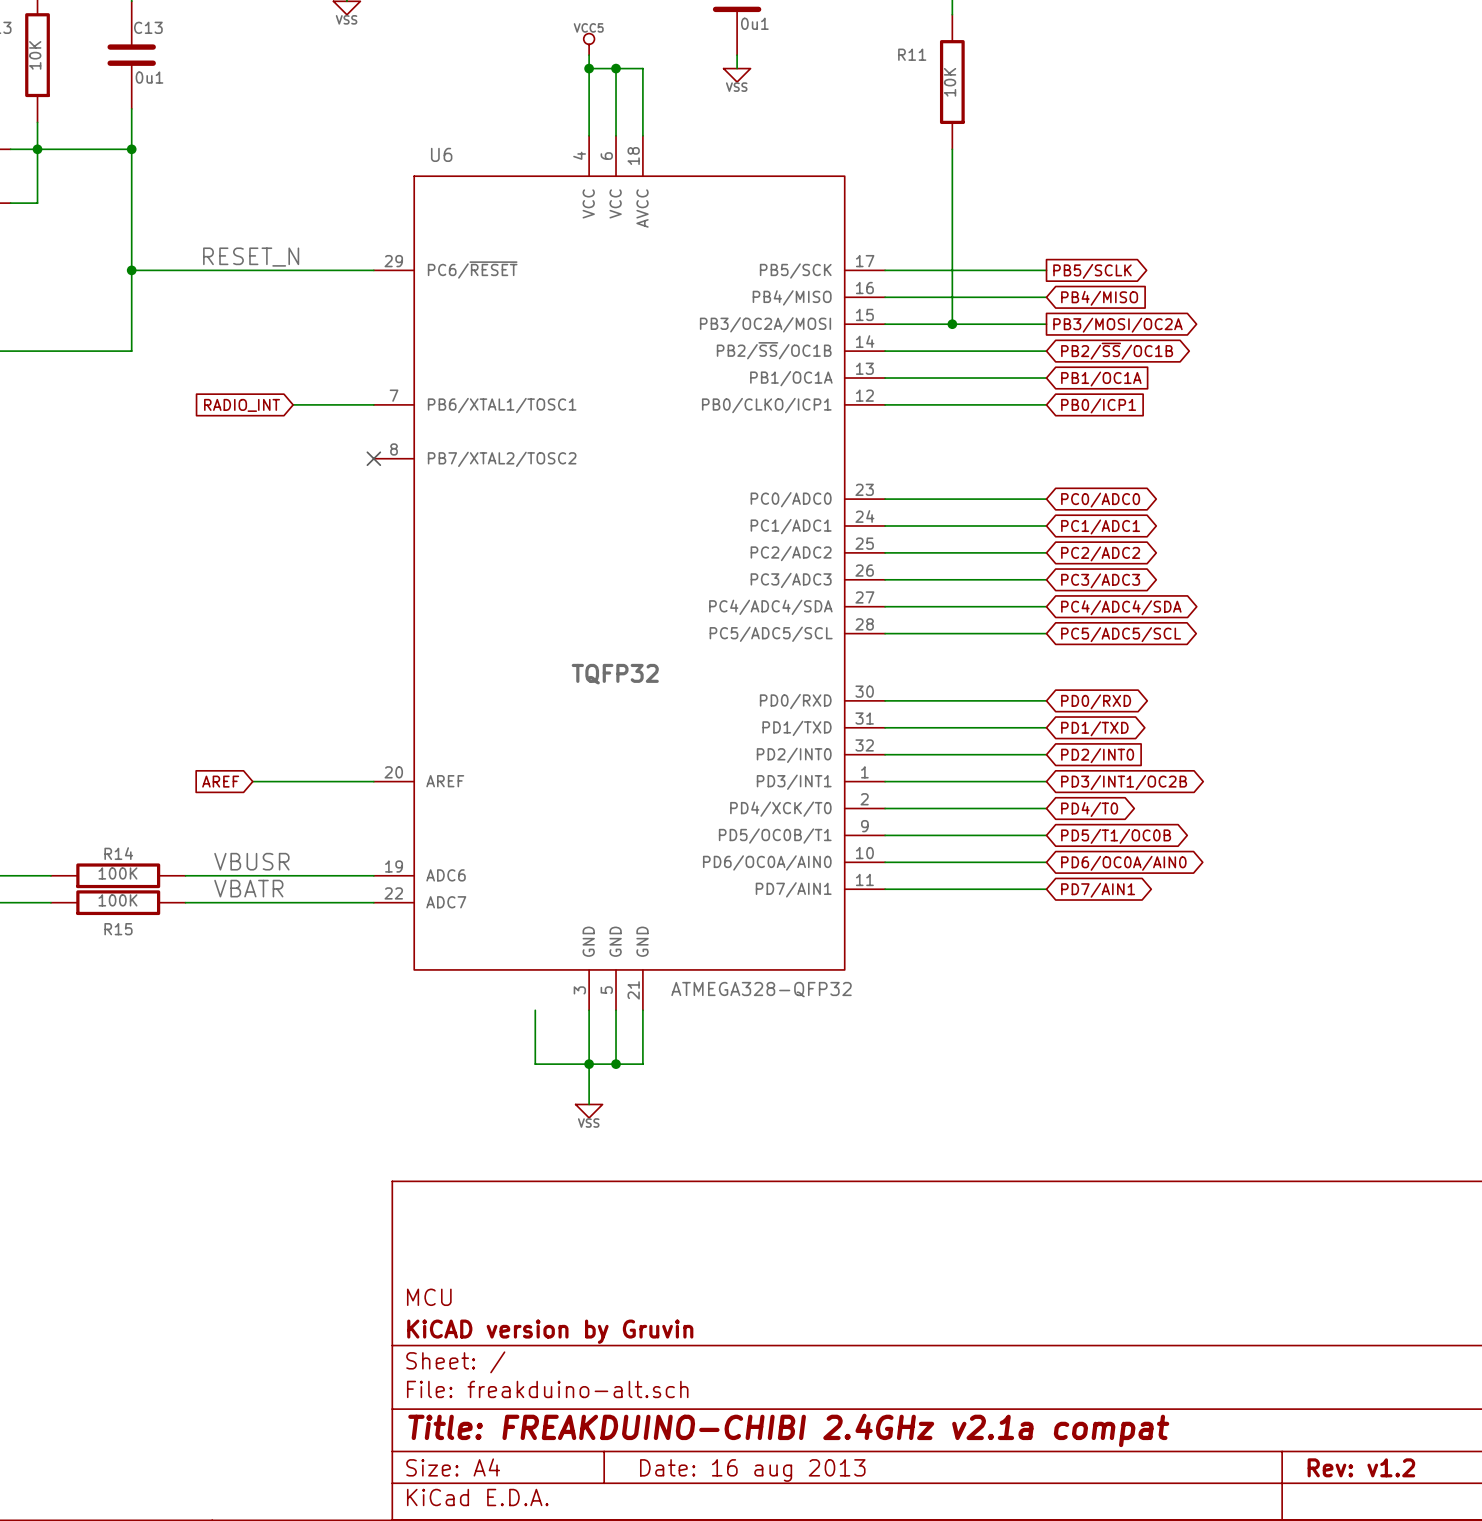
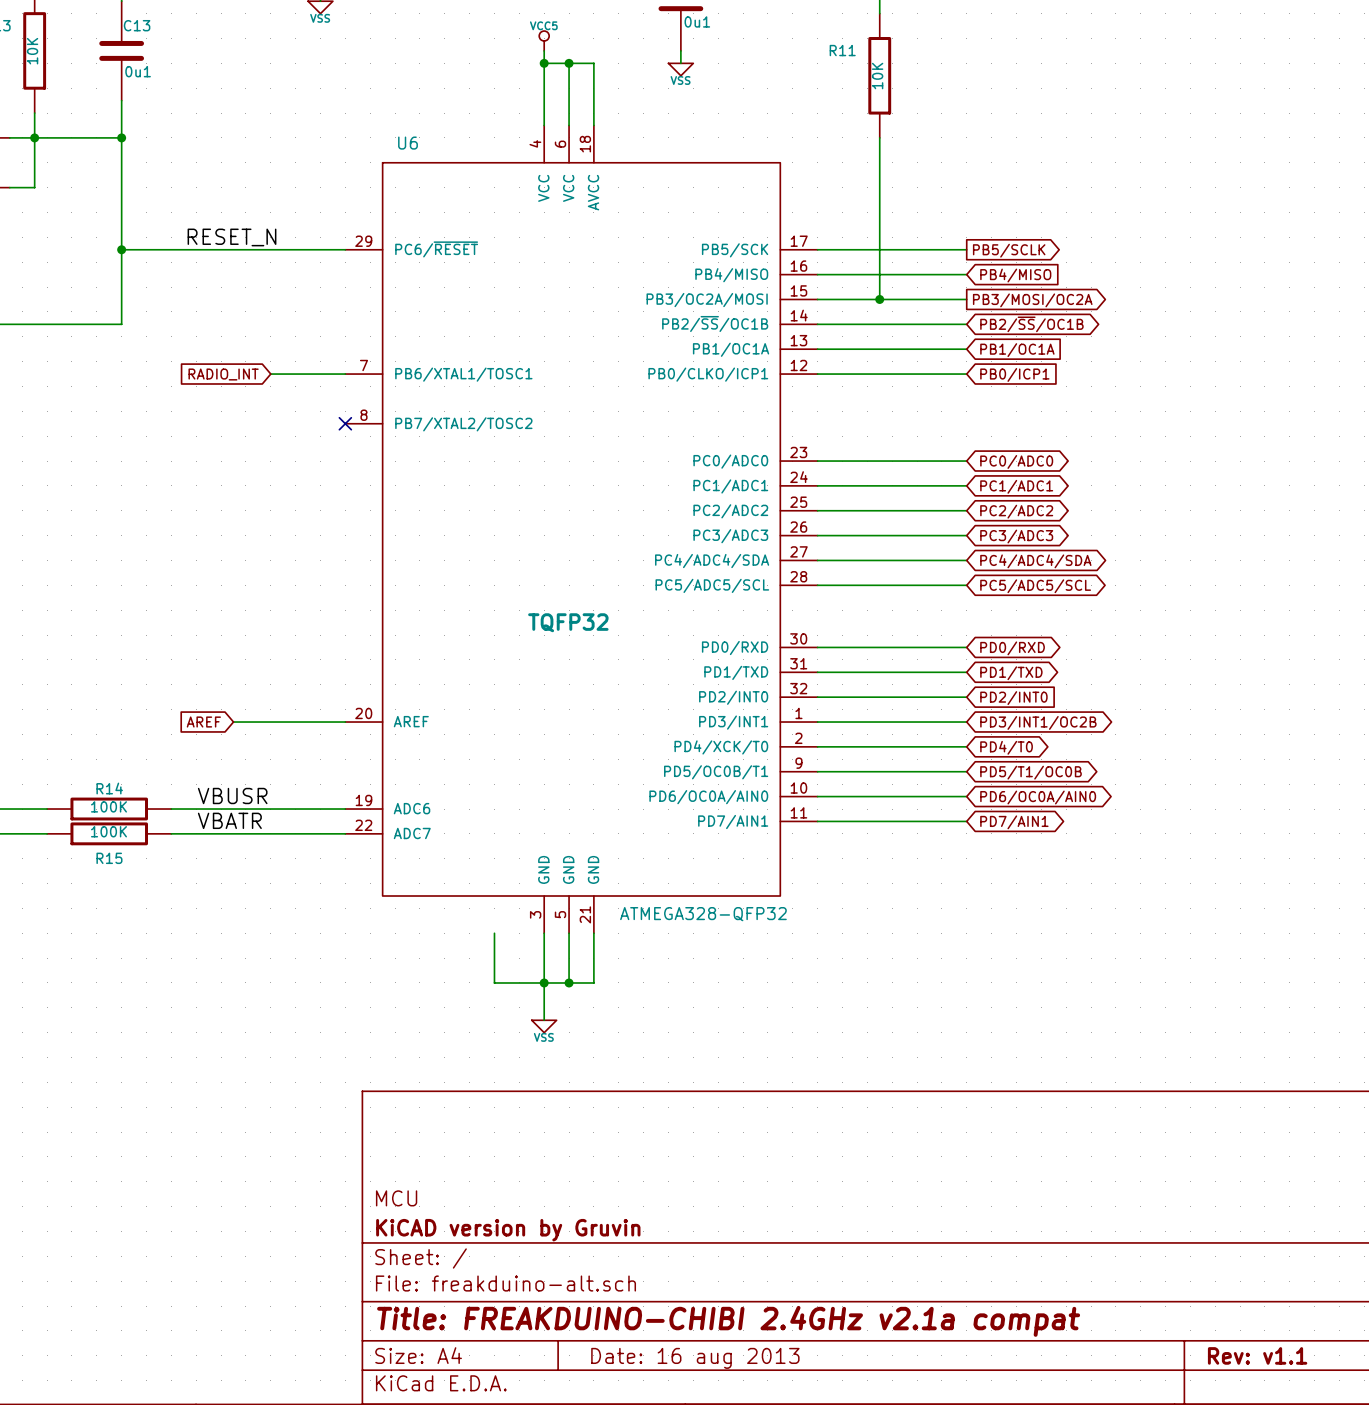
title block: Rev: v1.2 (1361, 1467) -> Rev: v1.1 (1257, 1355)

